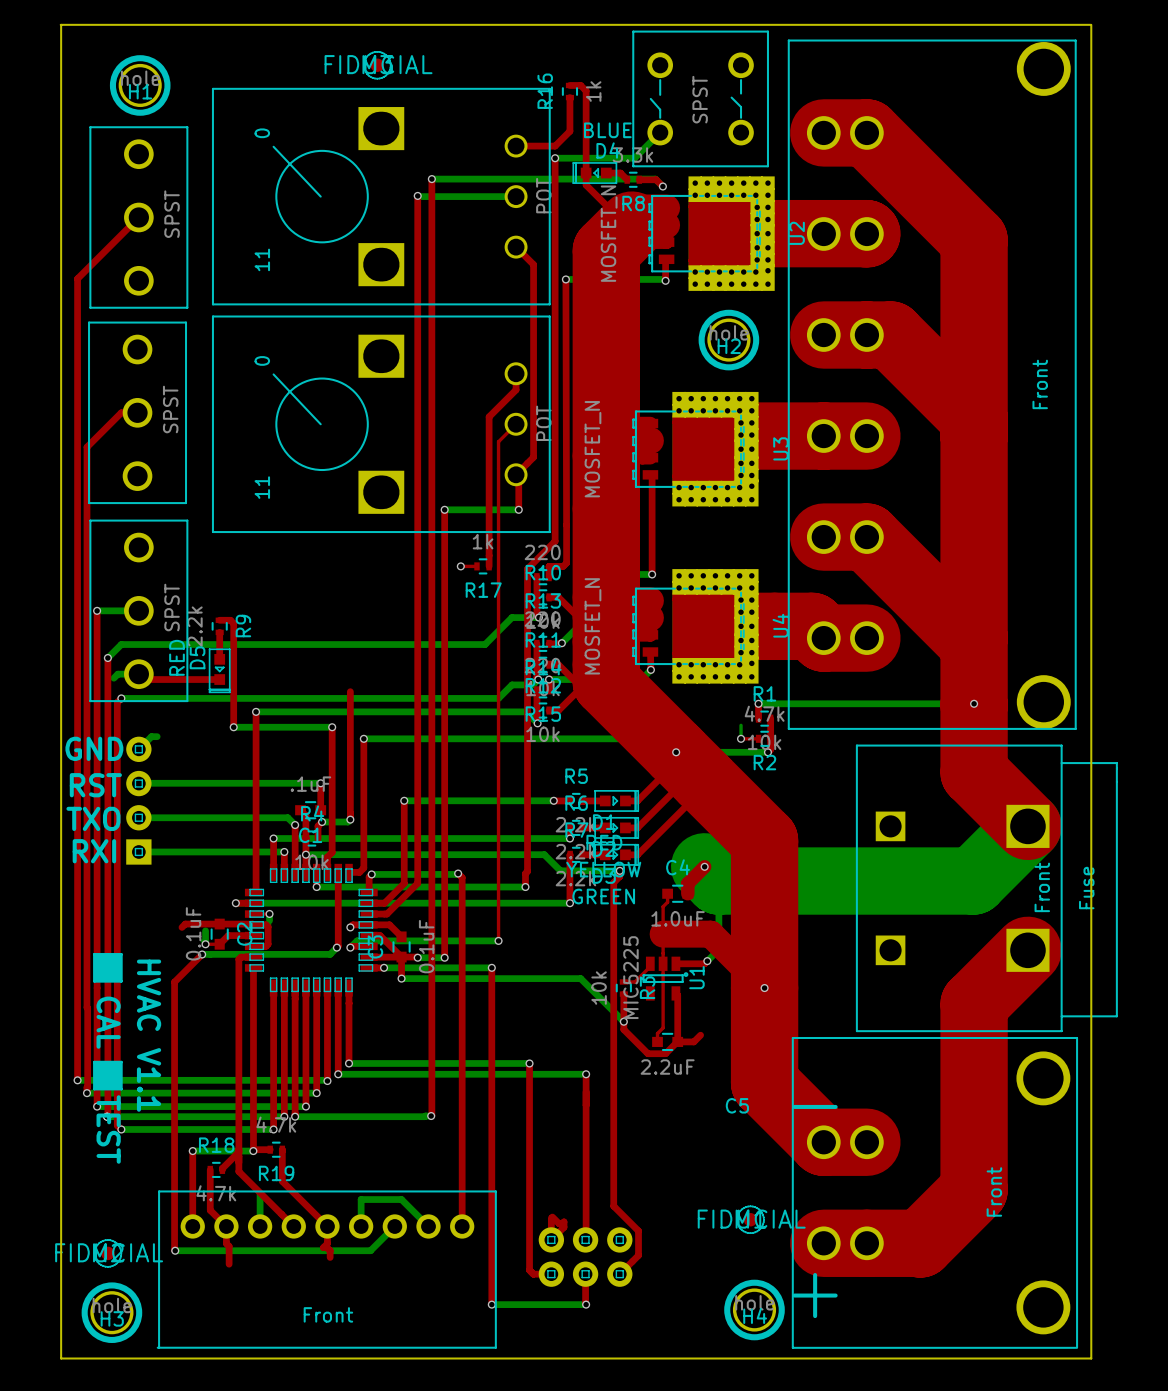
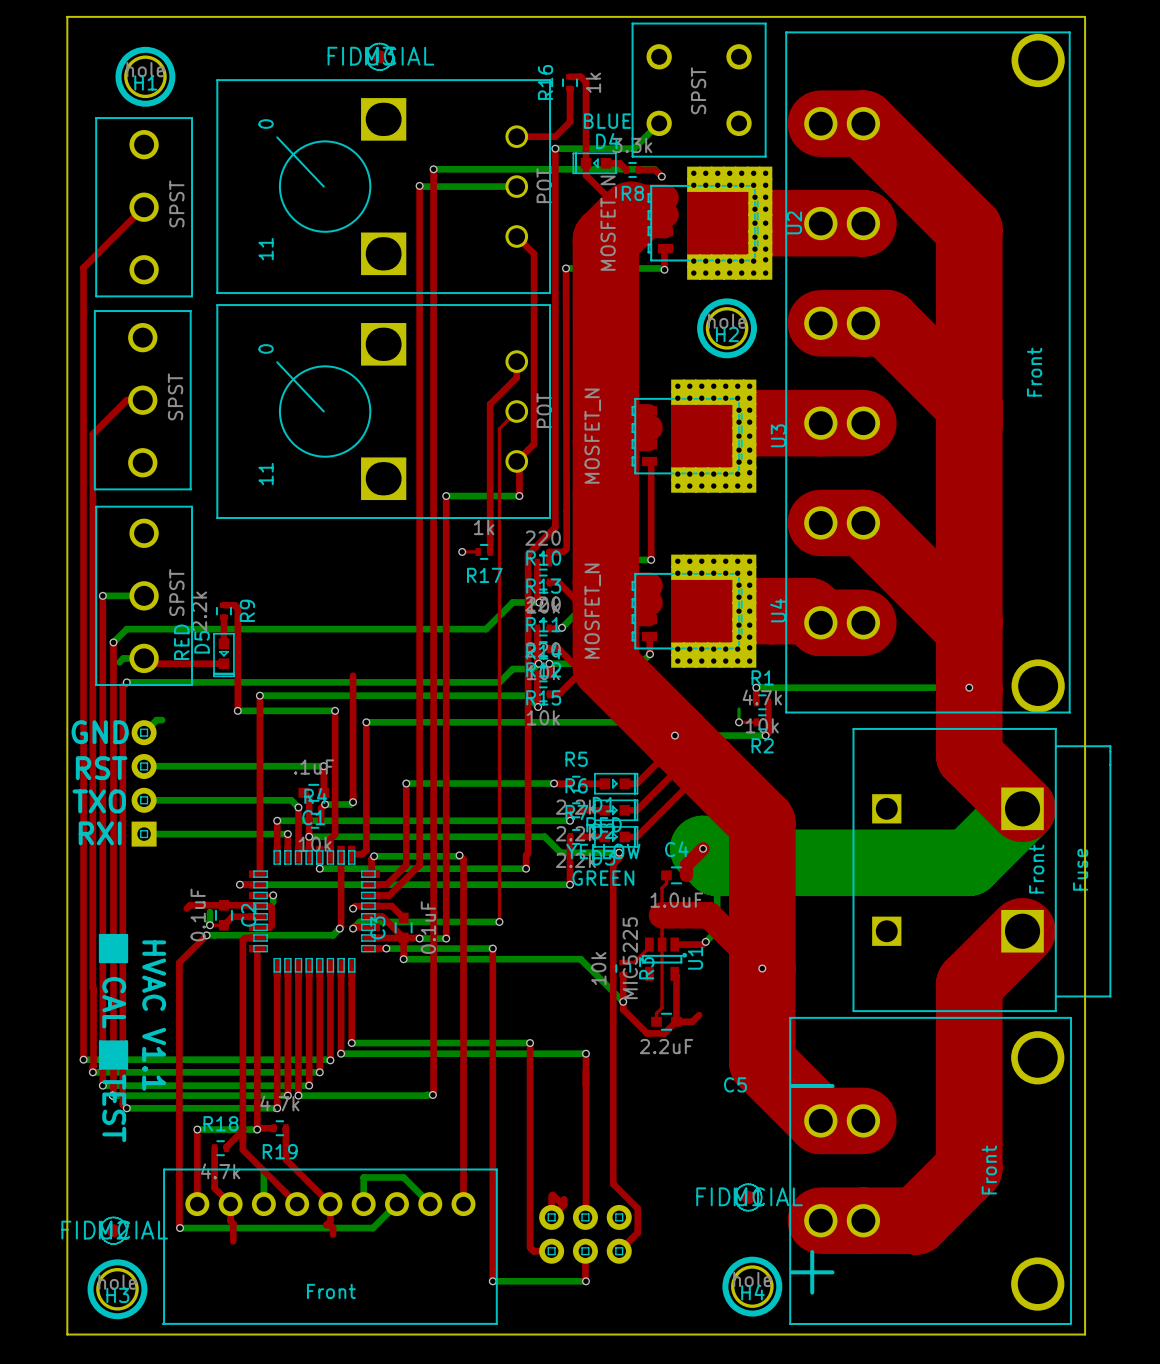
part footprint: [632, 30, 769, 168] -> [631, 22, 767, 158]

